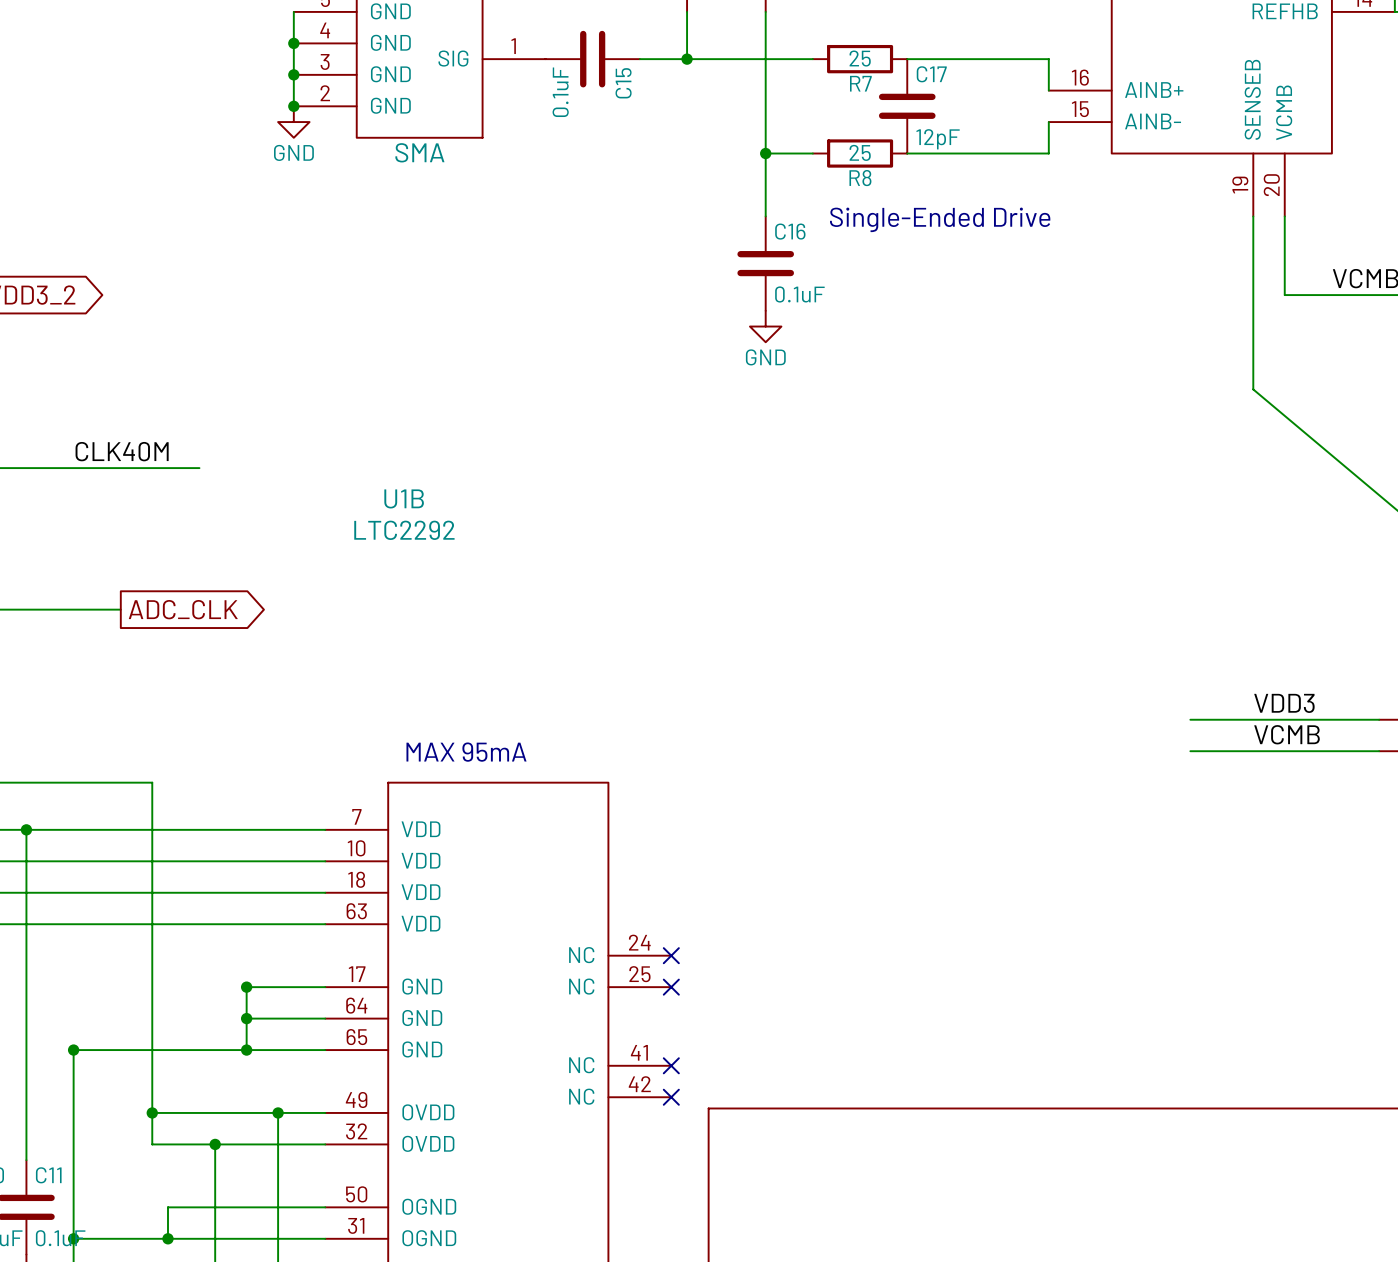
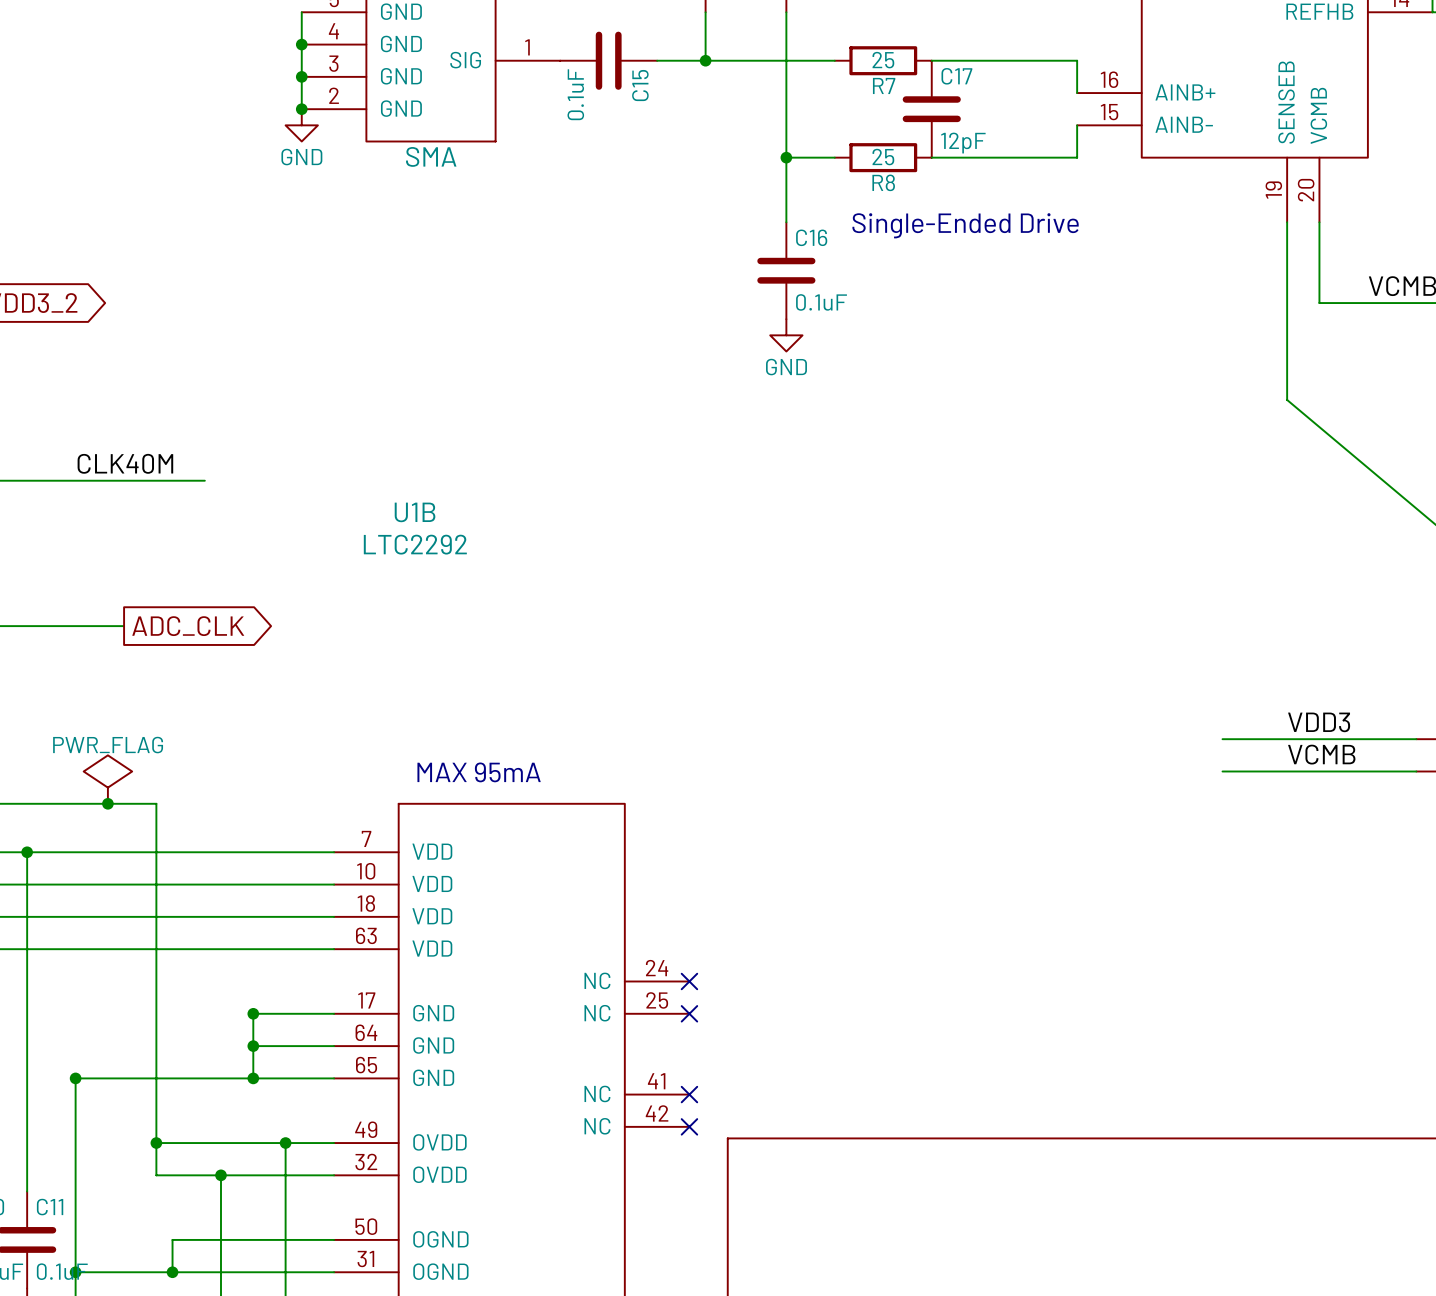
power symbol: none -> PWR_FLAG (107, 779)
junction: none -> (107, 803)

